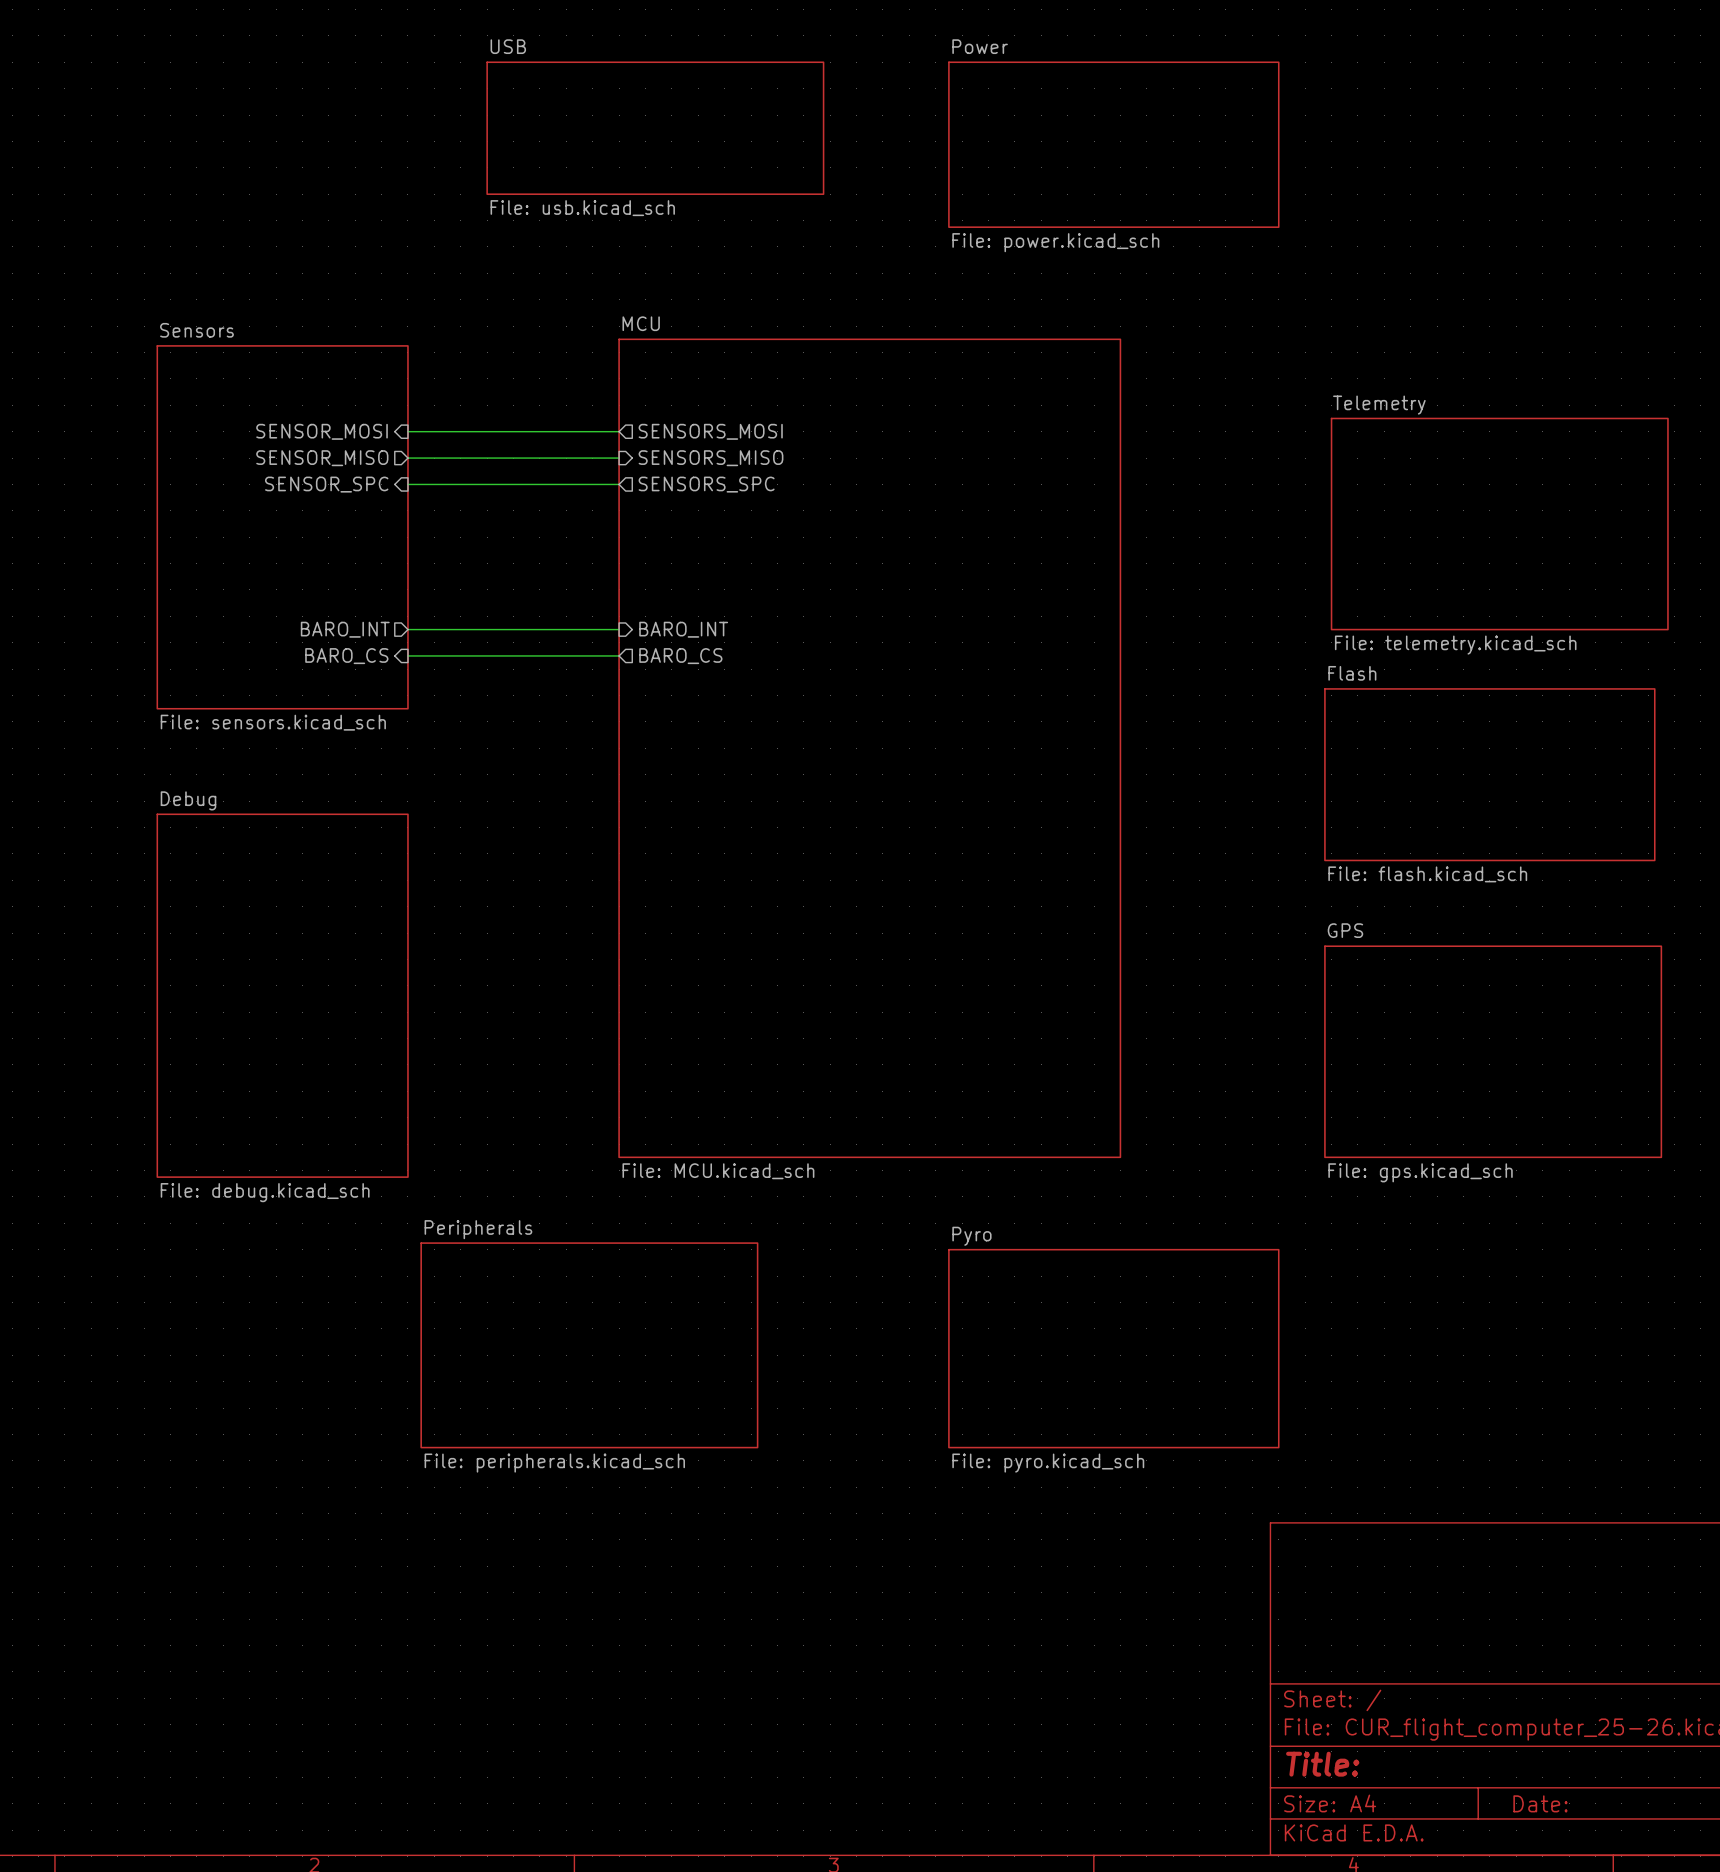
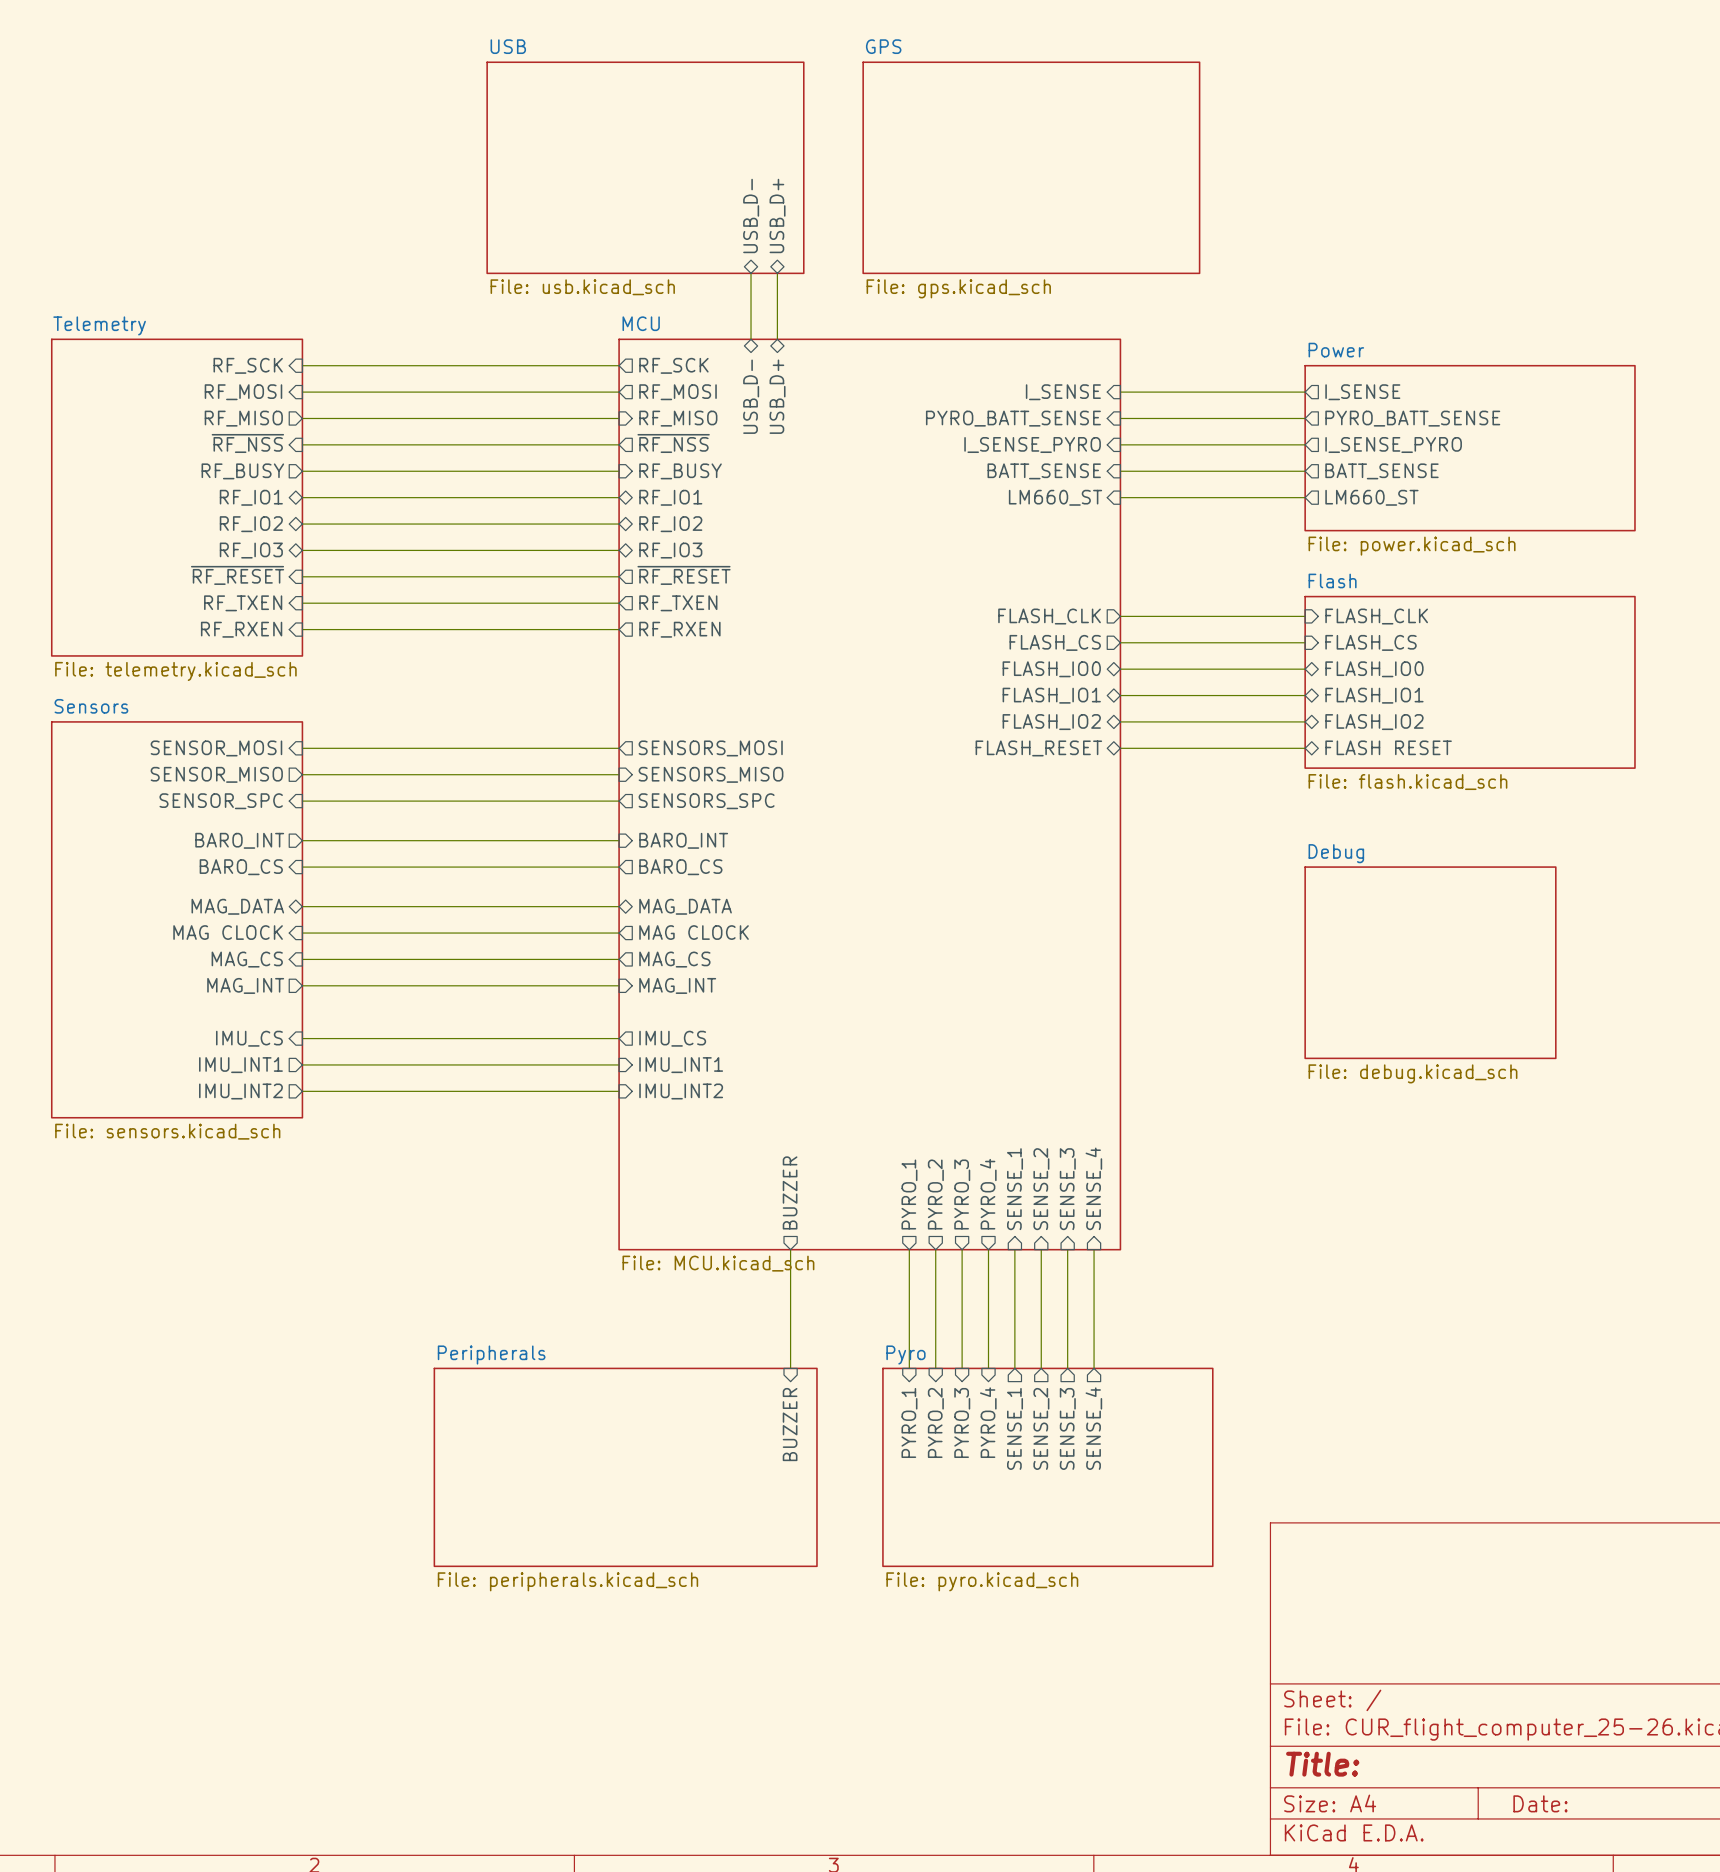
sheet USB: File: usb.kicad_sch (655, 128) -> none
sheet Power: File: power.kicad_sch (1113, 144) -> none
sheet USB: none -> File: usb.kicad_sch (645, 167)
sheet GPS: none -> File: gps.kicad_sch (1031, 167)
sheet pin: none -> USB_D- (751, 215)
sheet pin: none -> USB_D+ (777, 215)
wire: none -> (751, 273) (751, 339)
wire: none -> (777, 273) (777, 339)
sheet pin: none -> RF_SCK (248, 365)
wire: none -> (302, 365) (619, 365)
sheet pin: none -> RF_SCK (673, 365)
sheet pin: none -> RF_MOSI (243, 392)
wire: none -> (302, 392) (619, 392)
sheet pin: none -> RF_MOSI (678, 392)
sheet pin: none -> I_SENSE (1063, 392)
wire: none -> (1120, 392) (1305, 392)
sheet pin: none -> I_SENSE (1362, 392)
sheet pin: none -> USB_D- (751, 396)
sheet pin: none -> USB_D+ (777, 396)
sheet pin: none -> RF_MISO (243, 418)
wire: none -> (302, 418) (619, 418)
sheet pin: none -> RF_MISO (678, 418)
sheet pin: none -> PYRO_BATT_SENSE (1013, 418)
wire: none -> (1120, 418) (1305, 418)
sheet pin: none -> PYRO_BATT_SENSE (1412, 418)
sheet pin: SENSOR_MOSI (322, 431) -> none
wire: (407, 431) (619, 431) -> none
sheet pin: SENSORS_MOSI (710, 431) -> none
sheet pin: none -> ~{RF_NSS} (247, 443)
sheet pin: none -> ~{RF_NSS} (673, 443)
wire: none -> (302, 444) (619, 444)
wire: none -> (1120, 444) (1305, 444)
sheet pin: none -> I_SENSE_PYRO (1032, 445)
sheet pin: none -> I_SENSE_PYRO (1393, 445)
sheet Power: none -> File: power.kicad_sch (1470, 448)
sheet pin: SENSOR_MISO (322, 458) -> none
wire: (407, 458) (619, 458) -> none
sheet pin: SENSORS_MISO (711, 458) -> none
sheet pin: none -> RF_BUSY (242, 471)
wire: none -> (302, 471) (619, 471)
sheet pin: none -> RF_BUSY (680, 471)
sheet pin: none -> BATT_SENSE (1044, 471)
wire: none -> (1120, 471) (1305, 471)
sheet pin: none -> BATT_SENSE (1381, 471)
sheet pin: SENSOR_SPC (326, 484) -> none
wire: (407, 484) (619, 484) -> none
sheet pin: SENSORS_SPC (706, 484) -> none
sheet Telemetry: none -> File: telemetry.kicad_sch (177, 497)
sheet pin: none -> RF_IO1 (251, 497)
wire: none -> (302, 497) (619, 497)
sheet pin: none -> RF_IO1 (670, 497)
sheet pin: none -> LM660_ST (1055, 497)
wire: none -> (1120, 497) (1305, 497)
sheet pin: none -> LM660_ST (1371, 497)
sheet pin: none -> RF_IO2 (251, 524)
wire: none -> (302, 524) (619, 524)
sheet pin: none -> RF_IO2 (670, 524)
sheet Telemetry: File: telemetry.kicad_sch (1499, 524) -> none
sheet Sensors: File: sensors.kicad_sch (282, 527) -> none
sheet pin: none -> RF_IO3 (251, 550)
wire: none -> (302, 550) (619, 550)
sheet pin: none -> RF_IO3 (670, 550)
sheet pin: none -> ~{RF_RESET} (237, 575)
sheet pin: none -> ~{RF_RESET} (684, 575)
wire: none -> (302, 576) (619, 576)
sheet pin: none -> RF_TXEN (243, 603)
wire: none -> (302, 603) (619, 603)
sheet pin: none -> RF_TXEN (678, 603)
sheet pin: none -> FLASH_CLK (1049, 616)
wire: none -> (1120, 616) (1305, 616)
sheet pin: none -> FLASH_CLK (1376, 616)
sheet pin: none -> RF_RXEN (241, 629)
wire: none -> (302, 629) (407, 629)
sheet pin: BARO_INT (345, 629) -> none
sheet pin shape: input (683, 629) -> output (679, 629)
sheet pin: BARO_INT (683, 629) -> RF_RXEN (679, 629)
sheet pin: none -> FLASH_CS (1055, 642)
wire: none -> (1120, 642) (1305, 642)
sheet pin: none -> FLASH_CS (1371, 642)
wire: (407, 655) (619, 655) -> none
sheet pin: BARO_CS (346, 656) -> none
sheet pin: BARO_CS (680, 656) -> none
sheet pin: none -> FLASH_IO0 (1051, 669)
wire: none -> (1120, 669) (1305, 669)
sheet pin: none -> FLASH_IO0 (1374, 669)
sheet pin: none -> FLASH_IO1 (1051, 695)
wire: none -> (1120, 695) (1305, 695)
sheet pin: none -> FLASH_IO1 (1374, 695)
wire: none -> (1120, 721) (1305, 721)
sheet pin: none -> FLASH_IO2 (1051, 722)
sheet pin: none -> FLASH_IO2 (1374, 722)
sheet pin: none -> FLASH RESET (1388, 747)
sheet pin: none -> SENSOR_MOSI (216, 748)
wire: none -> (302, 748) (619, 748)
sheet pin: none -> SENSORS_MOSI (710, 748)
sheet MCU: File: MCU.kicad_sch (869, 748) -> none
sheet pin: none -> FLASH_RESET (1038, 748)
wire: none -> (1120, 748) (1305, 748)
sheet pin: none -> SENSOR_MISO (216, 774)
wire: none -> (302, 774) (619, 774)
sheet pin: none -> SENSORS_MISO (711, 774)
sheet Flash position: (1489, 774) -> (1470, 682)
sheet MCU: none -> File: MCU.kicad_sch (869, 794)
sheet pin: none -> SENSOR_SPC (221, 801)
wire: none -> (302, 801) (619, 801)
sheet pin: none -> SENSORS_SPC (706, 801)
sheet pin: none -> BARO_INT (239, 840)
wire: none -> (302, 840) (619, 840)
sheet pin: none -> BARO_INT (683, 840)
sheet pin: none -> BARO_CS (241, 867)
wire: none -> (302, 867) (619, 867)
sheet pin: none -> BARO_CS (680, 867)
sheet pin: none -> MAG_DATA (237, 906)
wire: none -> (302, 906) (619, 906)
sheet pin: none -> MAG_DATA (685, 906)
sheet Sensors: none -> File: sensors.kicad_sch (177, 919)
sheet pin: none -> MAG CLOCK (228, 932)
sheet pin: none -> MAG CLOCK (694, 932)
wire: none -> (302, 933) (619, 933)
sheet pin: none -> MAG_CS (247, 959)
wire: none -> (302, 959) (619, 959)
sheet pin: none -> MAG_CS (674, 959)
sheet Debug: none -> File: debug.kicad_sch (1430, 962)
sheet pin: none -> MAG_INT (245, 985)
wire: none -> (302, 985) (619, 985)
sheet pin: none -> MAG_INT (677, 985)
sheet Debug: File: debug.kicad_sch (282, 995) -> none
sheet pin: none -> IMU_CS (249, 1038)
wire: none -> (302, 1038) (619, 1038)
sheet pin: none -> IMU_CS (672, 1038)
sheet GPS: File: gps.kicad_sch (1493, 1051) -> none
wire: none -> (302, 1064) (619, 1064)
sheet pin: none -> IMU_INT1 (240, 1065)
sheet pin: none -> IMU_INT1 (681, 1065)
sheet pin: none -> IMU_INT2 (240, 1091)
wire: none -> (302, 1091) (619, 1091)
sheet pin: none -> IMU_INT2 (681, 1091)
sheet pin: none -> SENSE_4 (1093, 1188)
sheet pin: none -> SENSE_1 (1015, 1189)
sheet pin: none -> SENSE_2 (1041, 1189)
sheet pin: none -> SENSE_3 (1067, 1189)
sheet pin: none -> BUZZER (790, 1192)
sheet pin: none -> PYRO_1 (909, 1194)
sheet pin: none -> PYRO_2 (935, 1194)
sheet pin: none -> PYRO_3 (962, 1194)
sheet pin: none -> PYRO_4 (988, 1194)
wire: none -> (790, 1249) (790, 1368)
wire: none -> (909, 1249) (909, 1368)
wire: none -> (935, 1249) (935, 1368)
wire: none -> (962, 1249) (962, 1368)
wire: none -> (988, 1249) (988, 1368)
wire: none -> (1014, 1249) (1014, 1368)
wire: none -> (1041, 1249) (1041, 1368)
wire: none -> (1067, 1249) (1067, 1368)
wire: none -> (1094, 1249) (1094, 1368)
sheet Peripherals: File: peripherals.kicad_sch (589, 1345) -> none
sheet Pyro position: (1113, 1348) -> (1047, 1467)
sheet pin: none -> PYRO_1 (909, 1422)
sheet pin: none -> PYRO_2 (935, 1422)
sheet pin: none -> PYRO_3 (962, 1422)
sheet pin: none -> PYRO_4 (988, 1422)
sheet pin: none -> BUZZER (790, 1424)
sheet pin: none -> SENSE_1 (1015, 1428)
sheet pin: none -> SENSE_2 (1041, 1428)
sheet pin: none -> SENSE_3 (1067, 1428)
sheet pin: none -> SENSE_4 (1093, 1428)
sheet Peripherals: none -> File: peripherals.kicad_sch (625, 1467)

